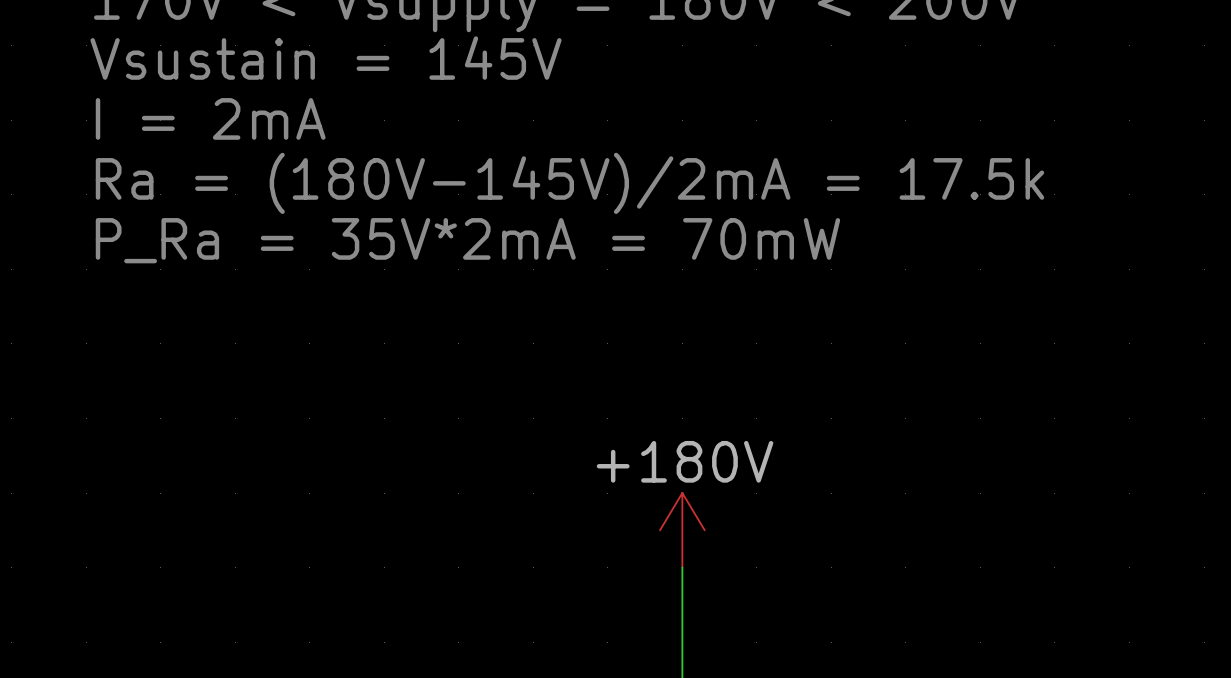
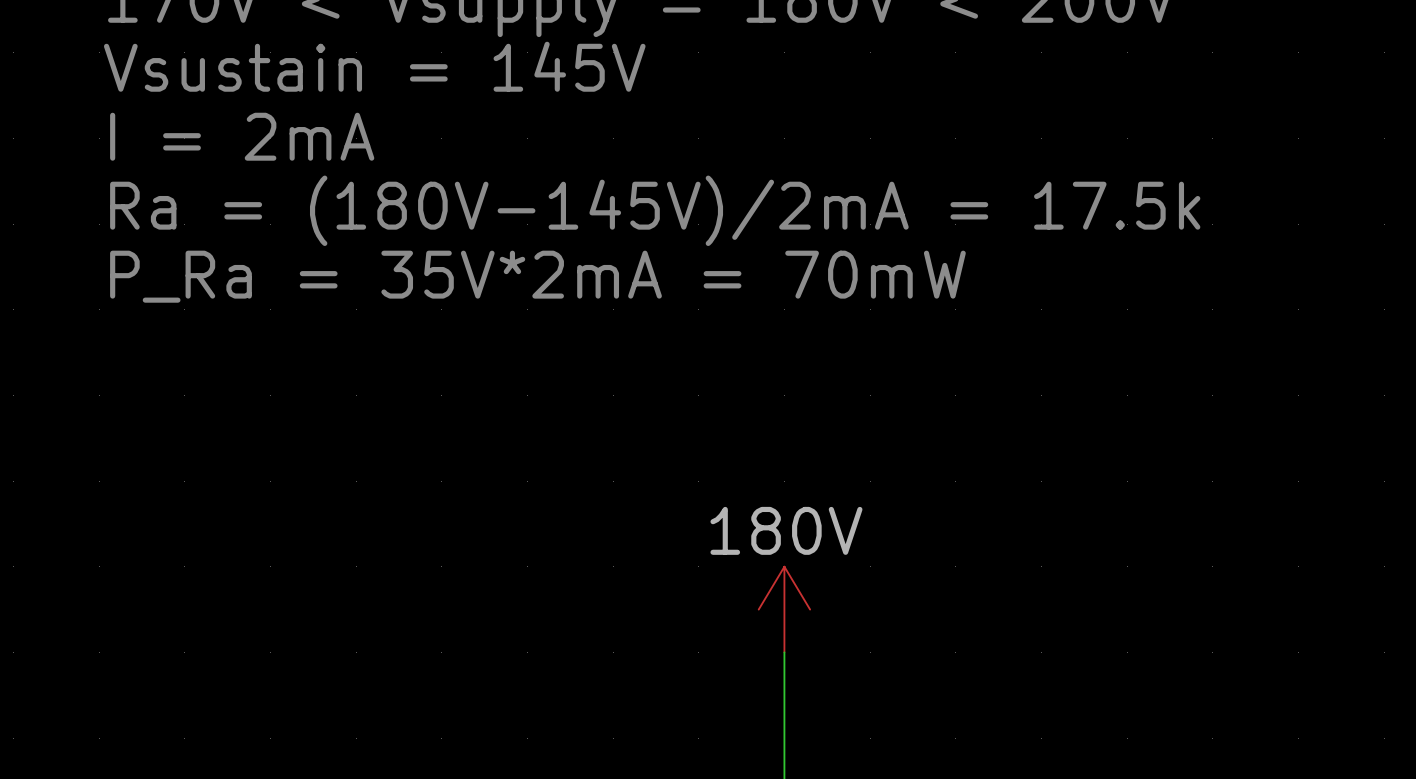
power symbol: +180V (682, 530) -> 180V (784, 609)

